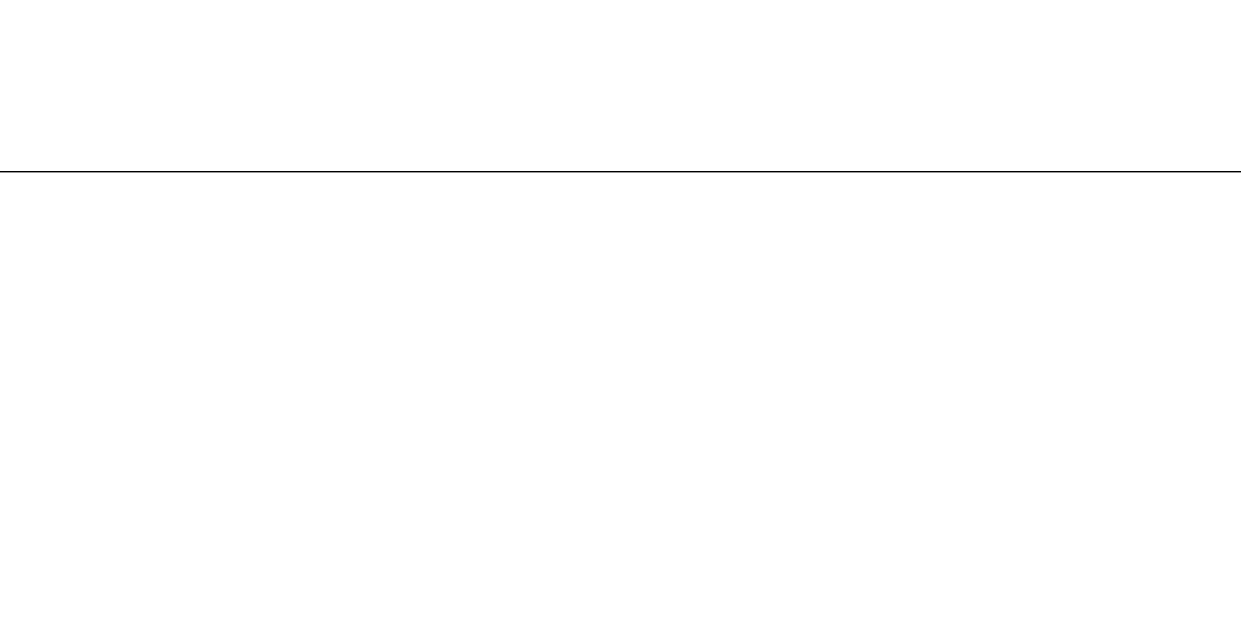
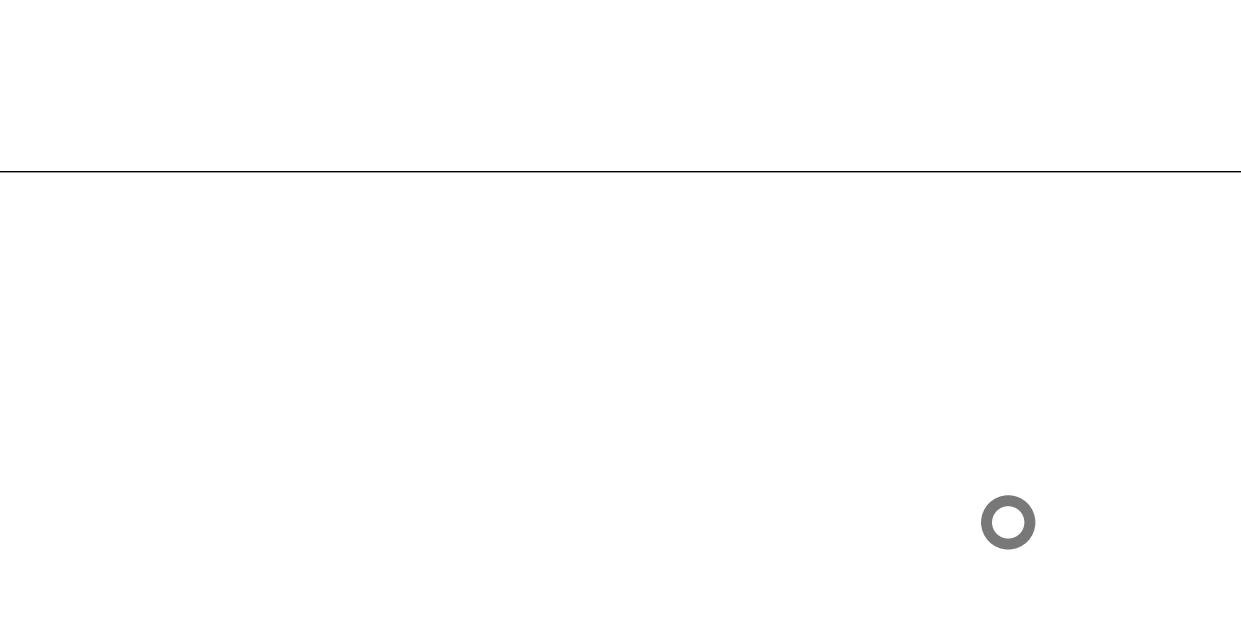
via: none -> (1008, 522)

